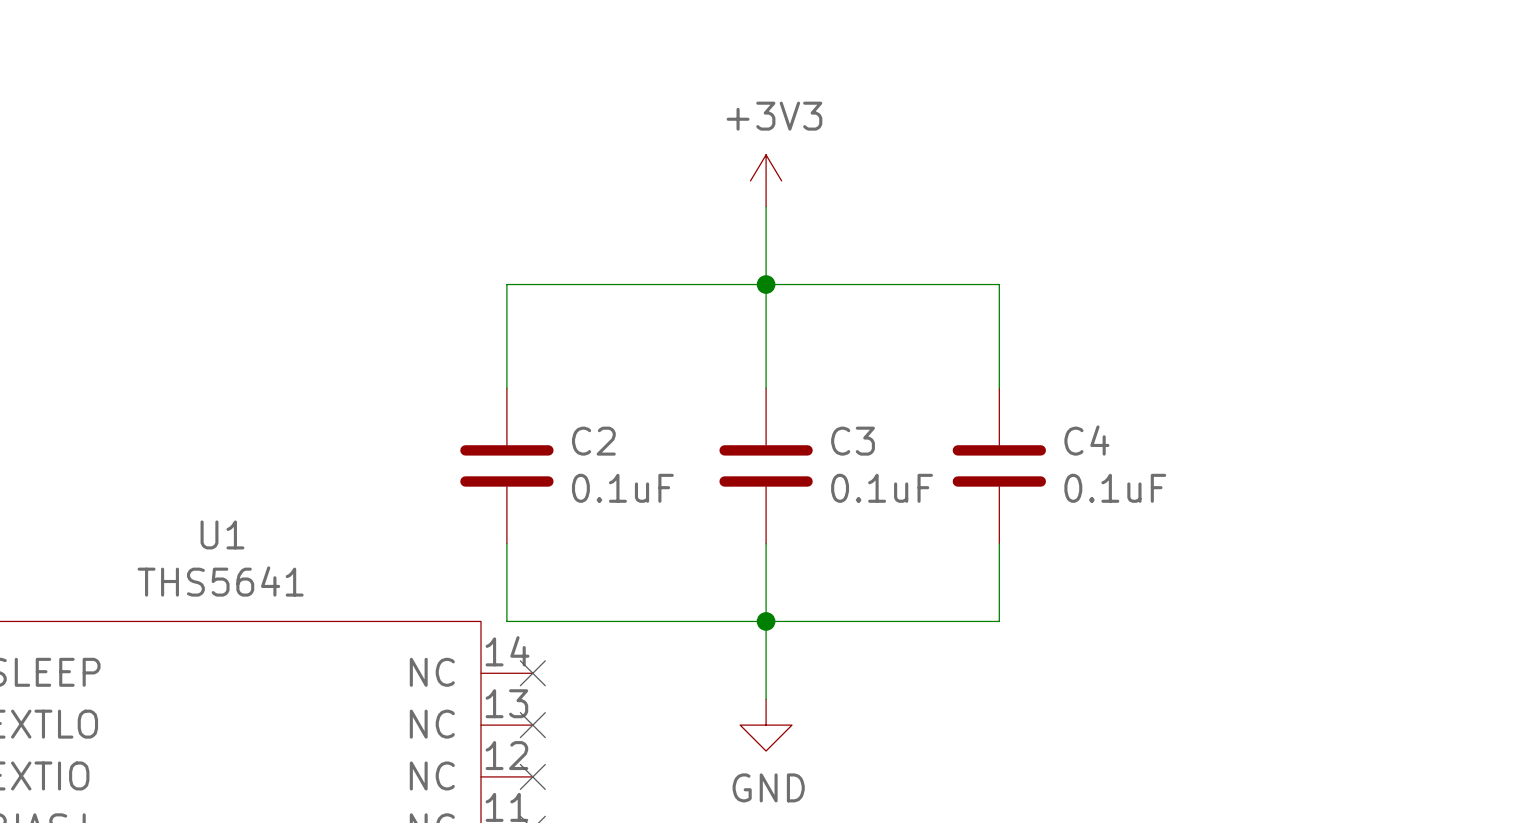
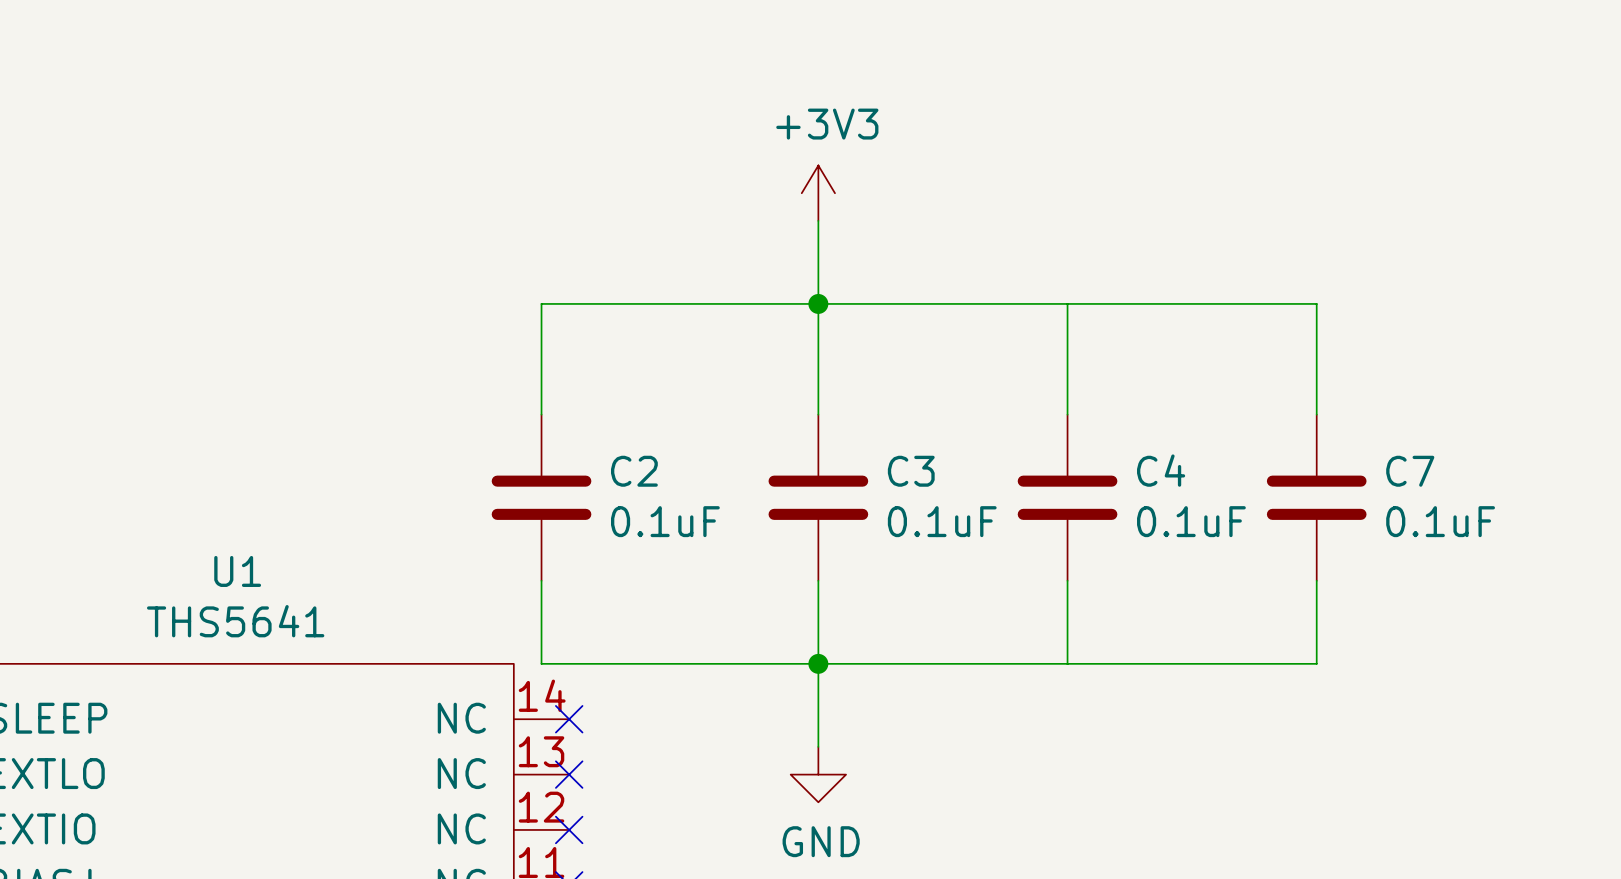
wire: none -> (1067, 303) (1316, 303) (1316, 414)
C7: none -> 0.1uF (1316, 497)
wire: none -> (1316, 580) (1316, 663) (1067, 663)

